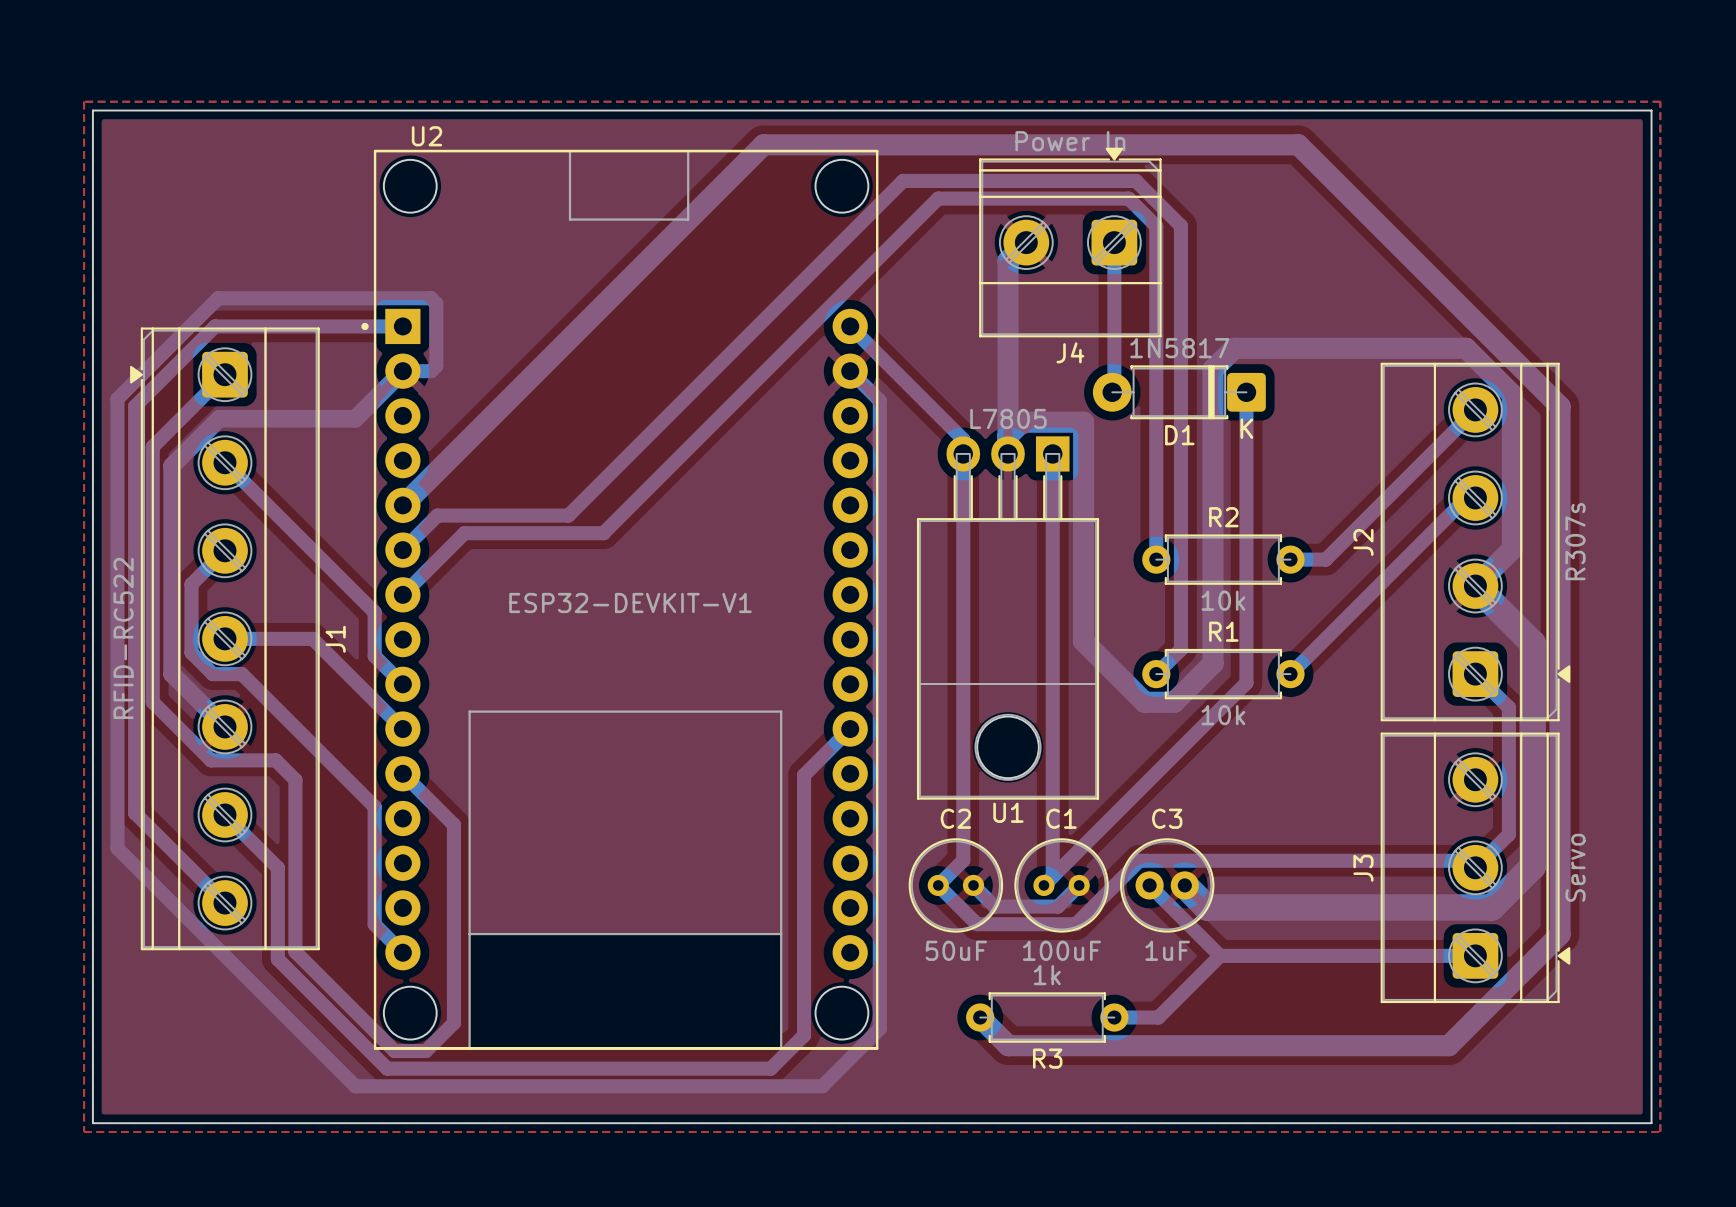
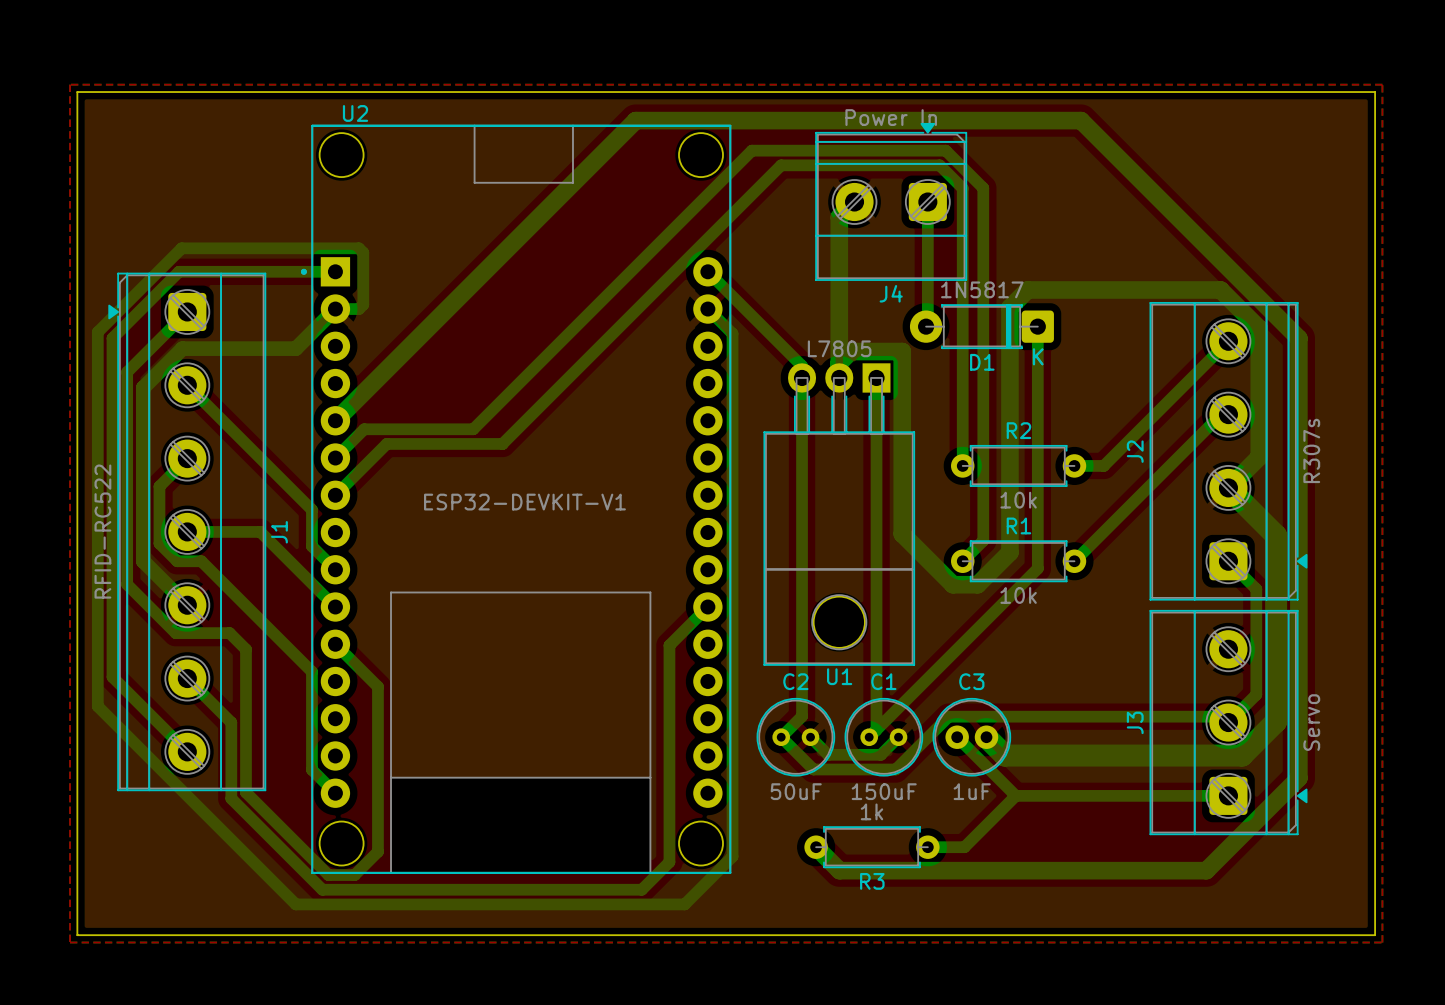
C1 value: 100uF (1061, 950) -> 150uF (884, 791)

